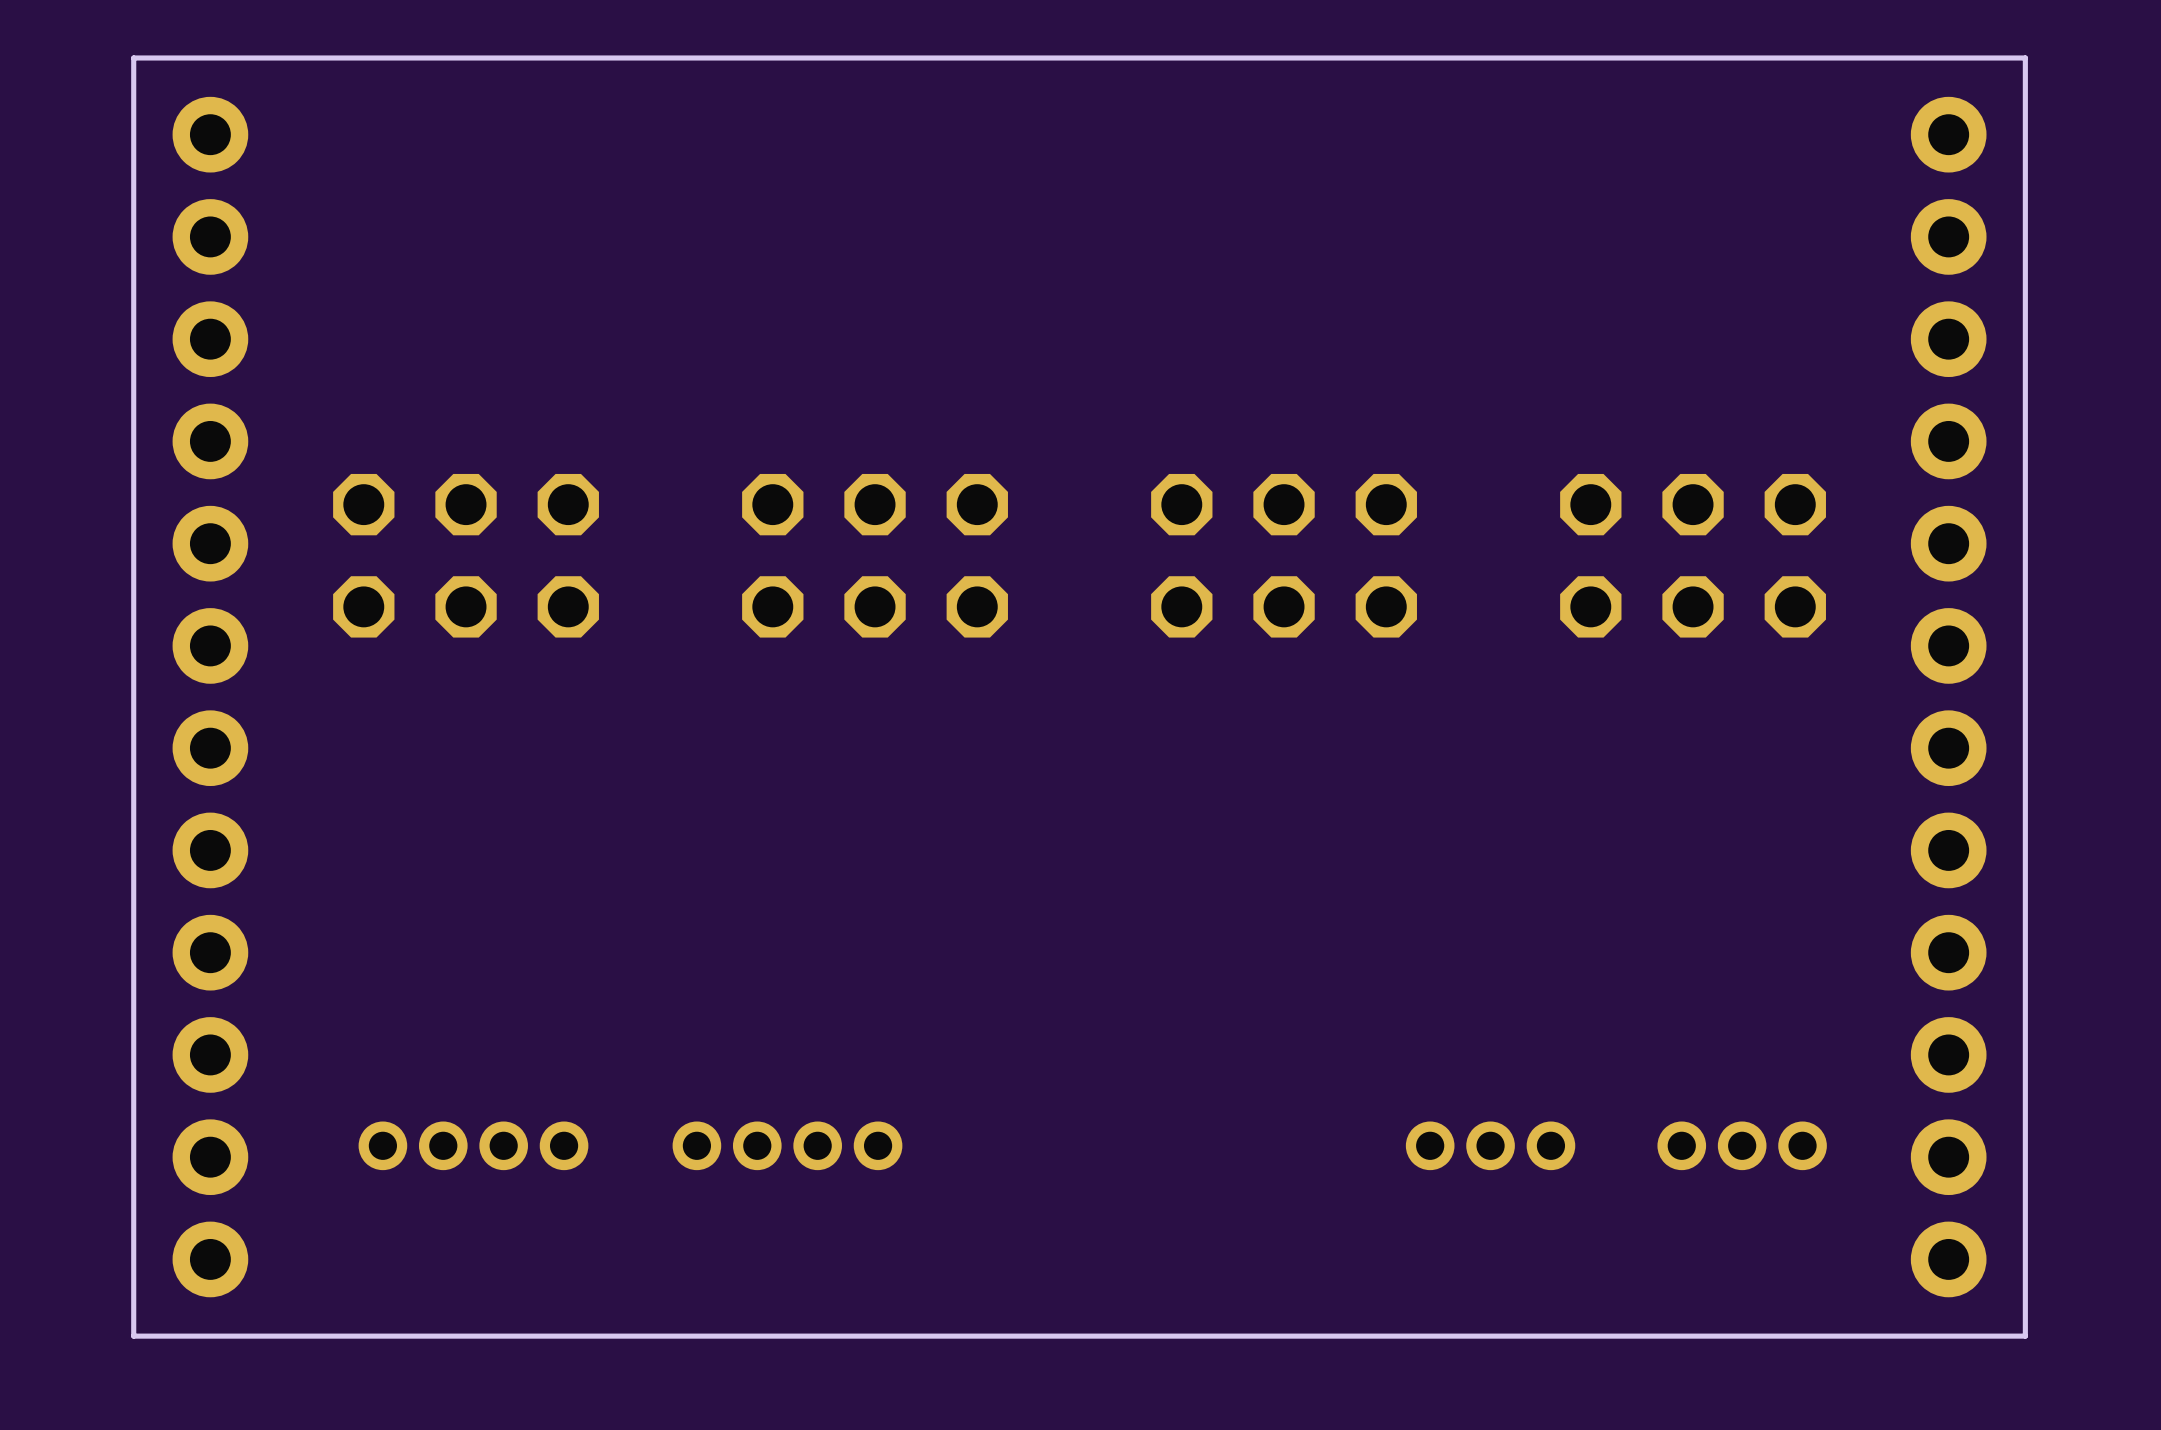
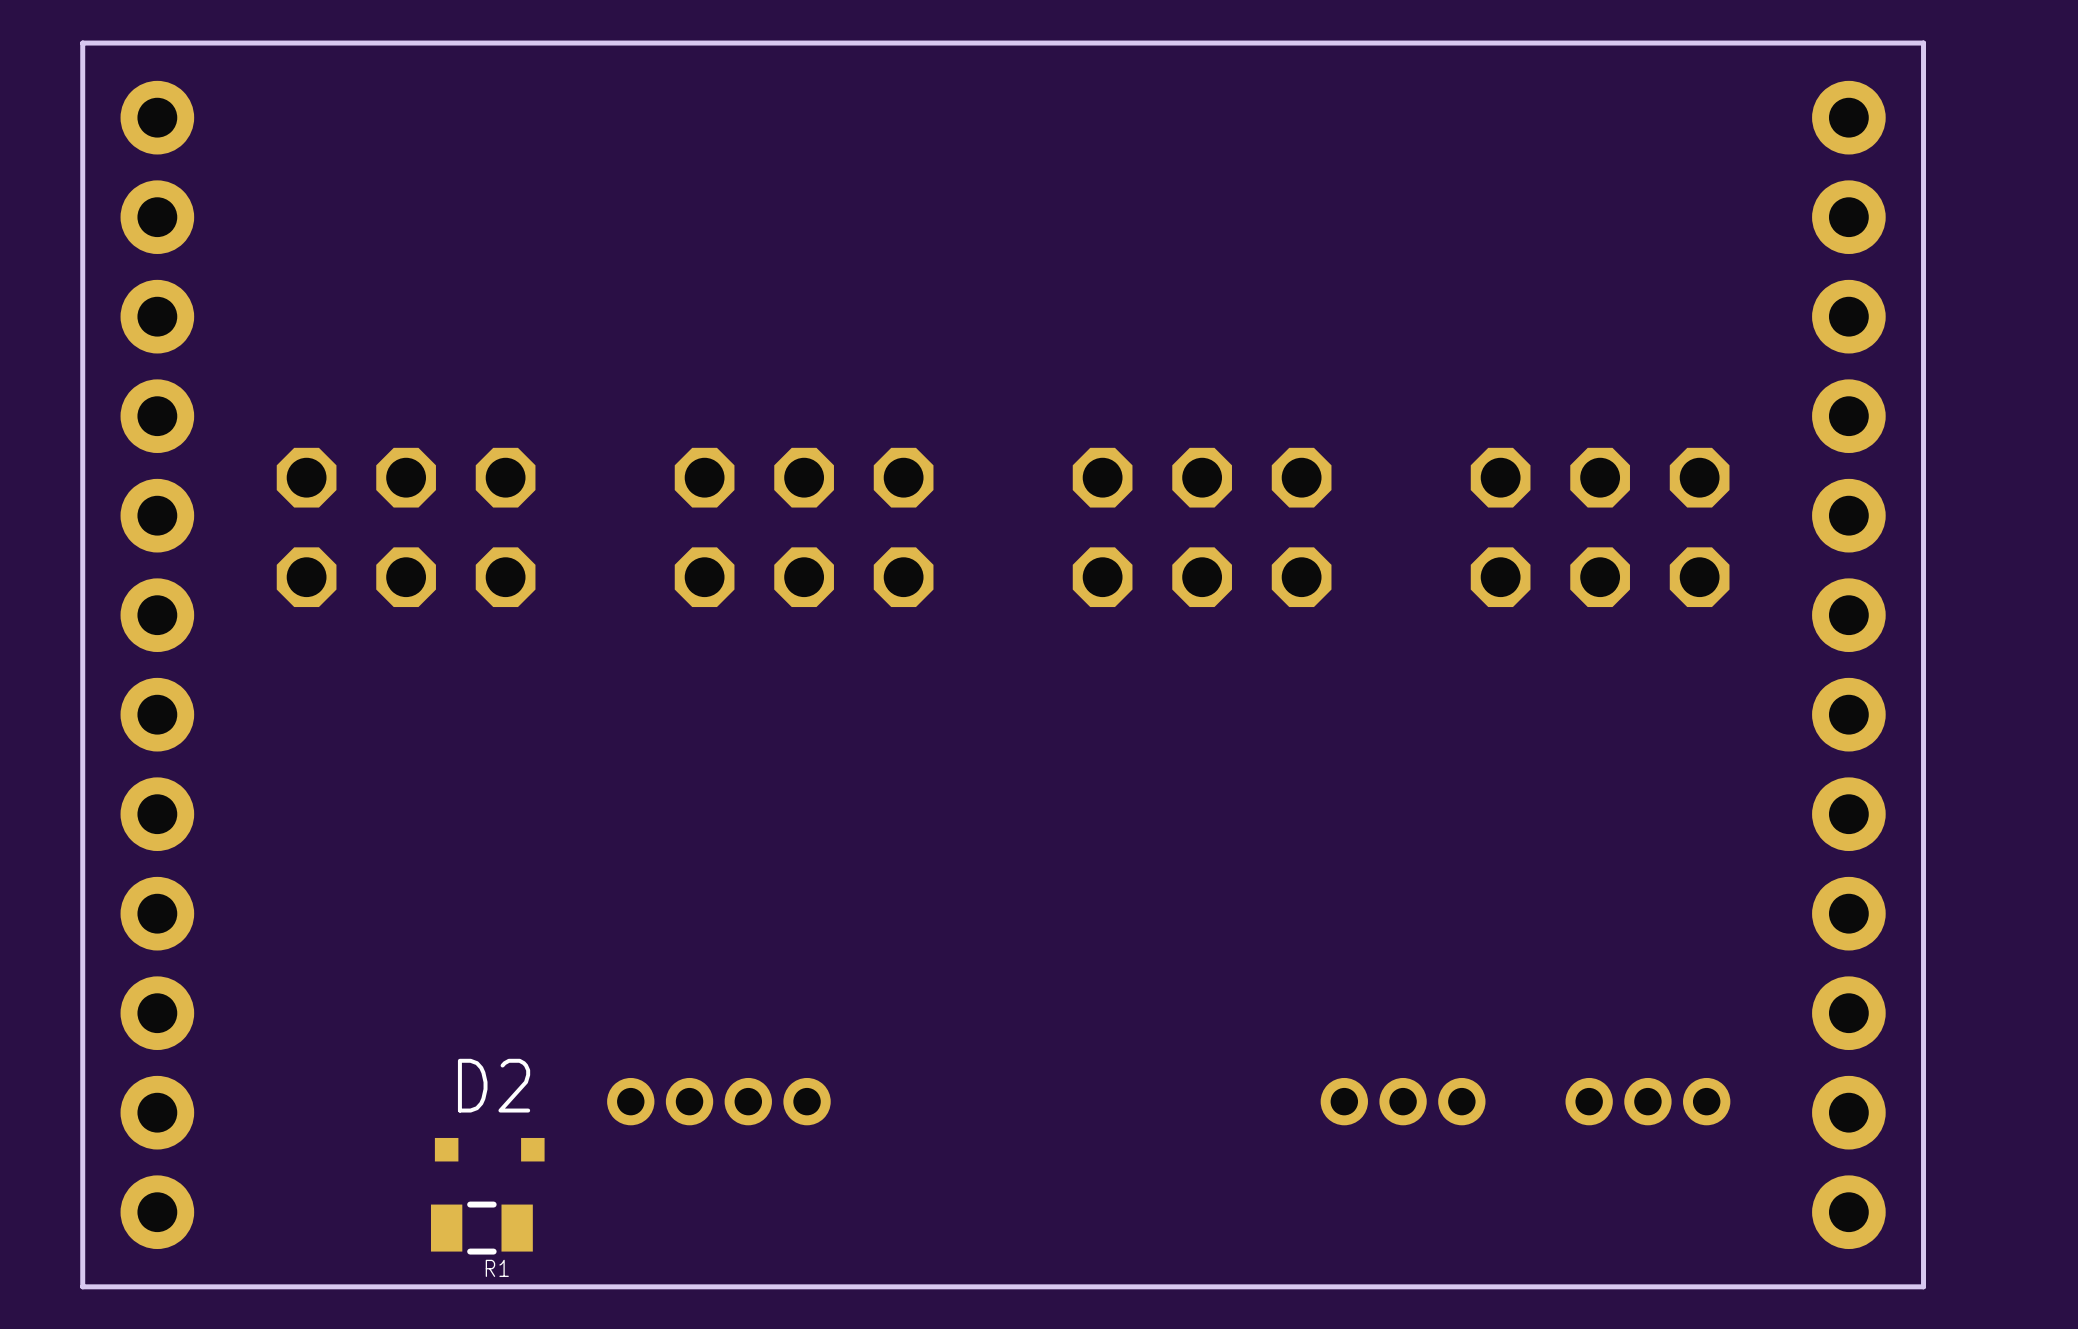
part: (473, 1145) -> none
D2: none -> (489, 1149)
R1: none -> (481, 1228)

